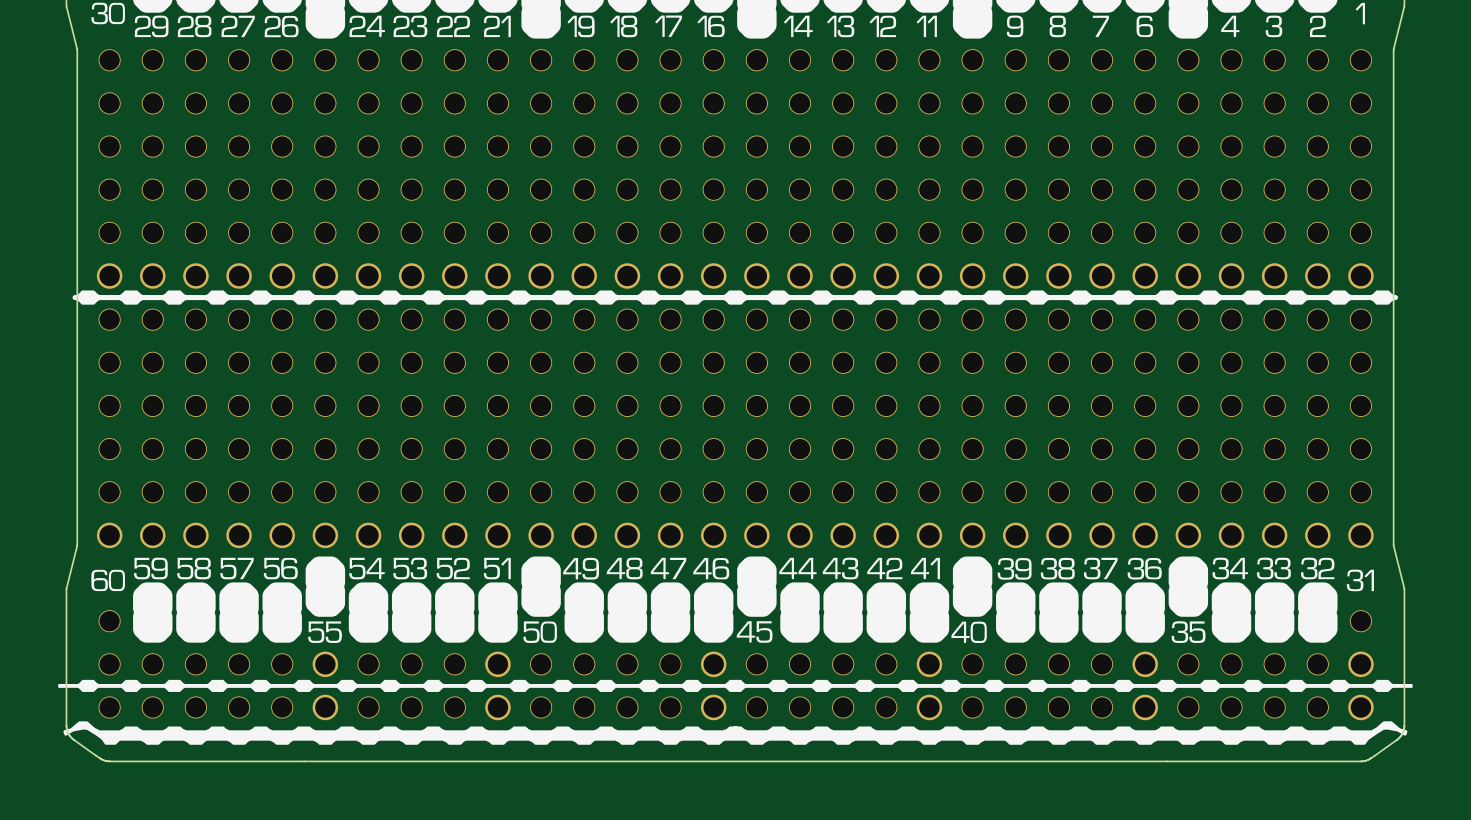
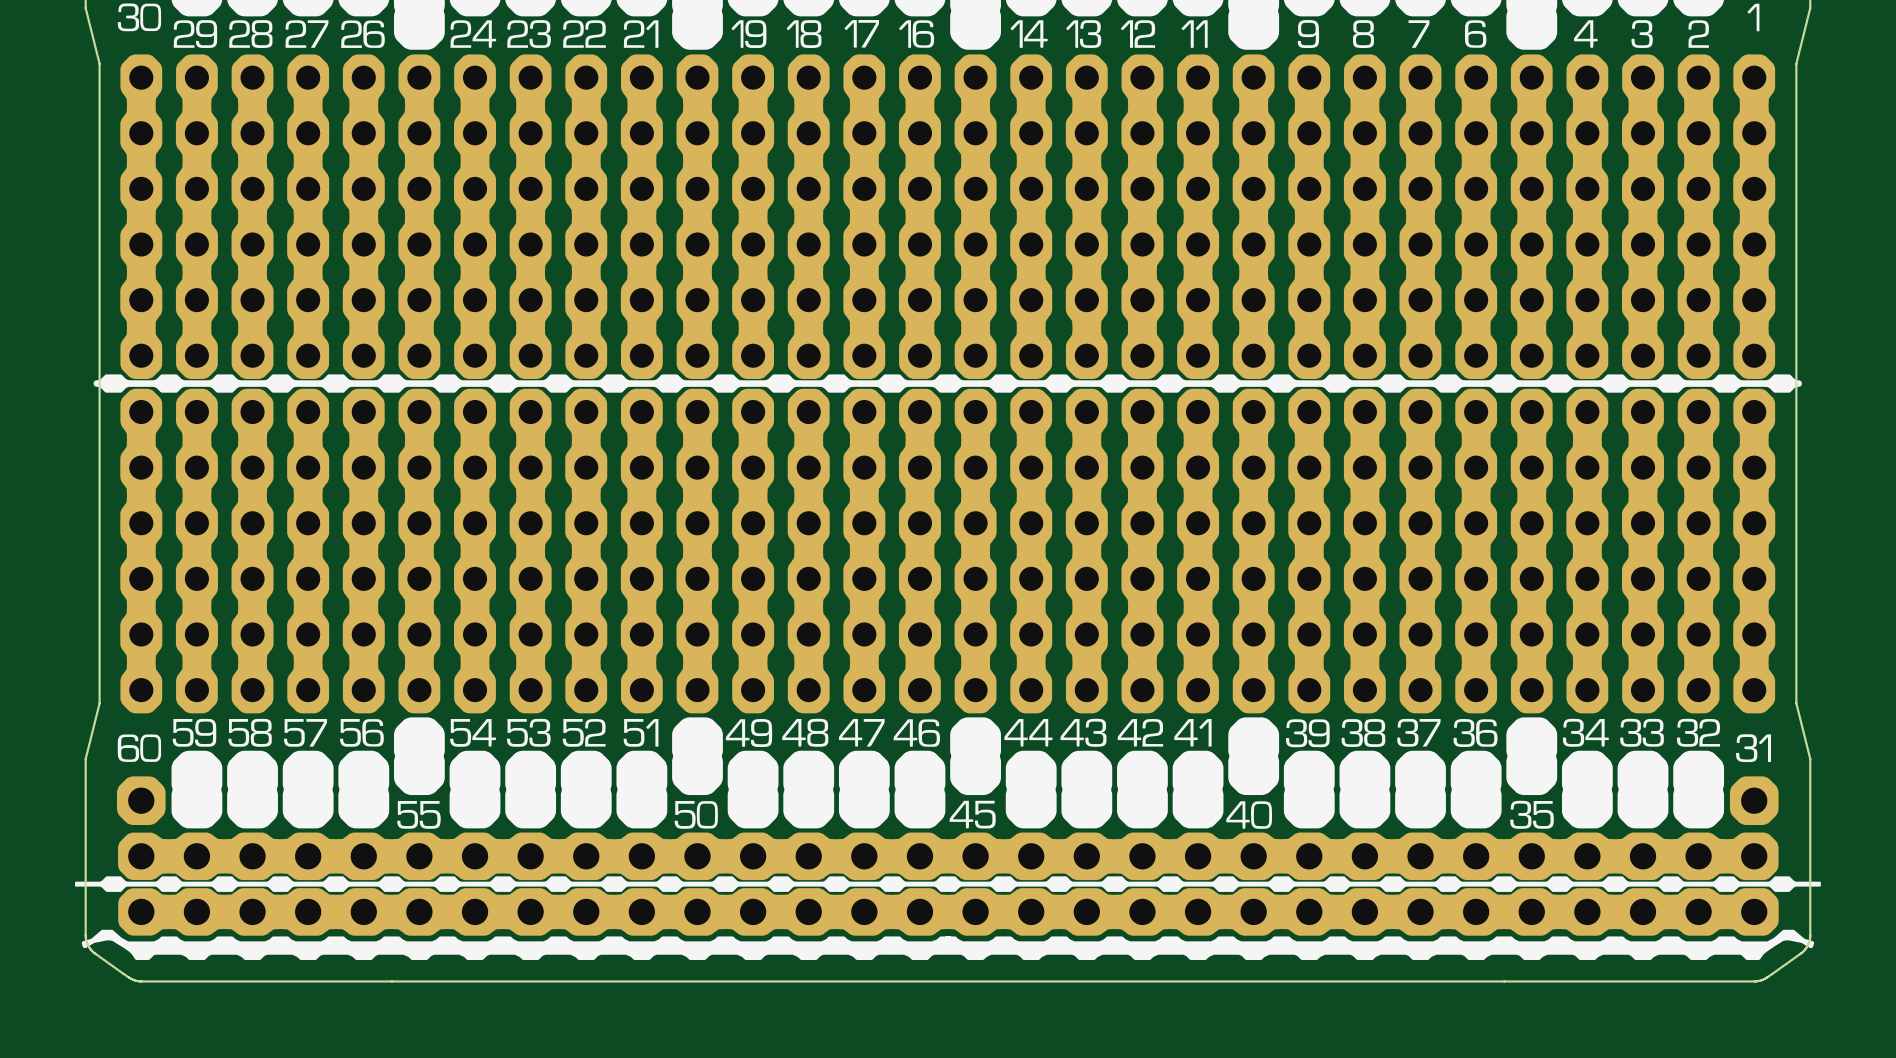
part footprint: [96, 49, 1374, 289] -> [120, 54, 1776, 379]
part footprint: [96, 308, 1374, 549] -> [120, 388, 1776, 714]
part footprint: [98, 610, 121, 633] -> [116, 776, 166, 826]
part footprint: [1349, 610, 1372, 633] -> [1729, 776, 1779, 826]
part footprint: [98, 651, 1374, 721] -> [118, 832, 1779, 936]

